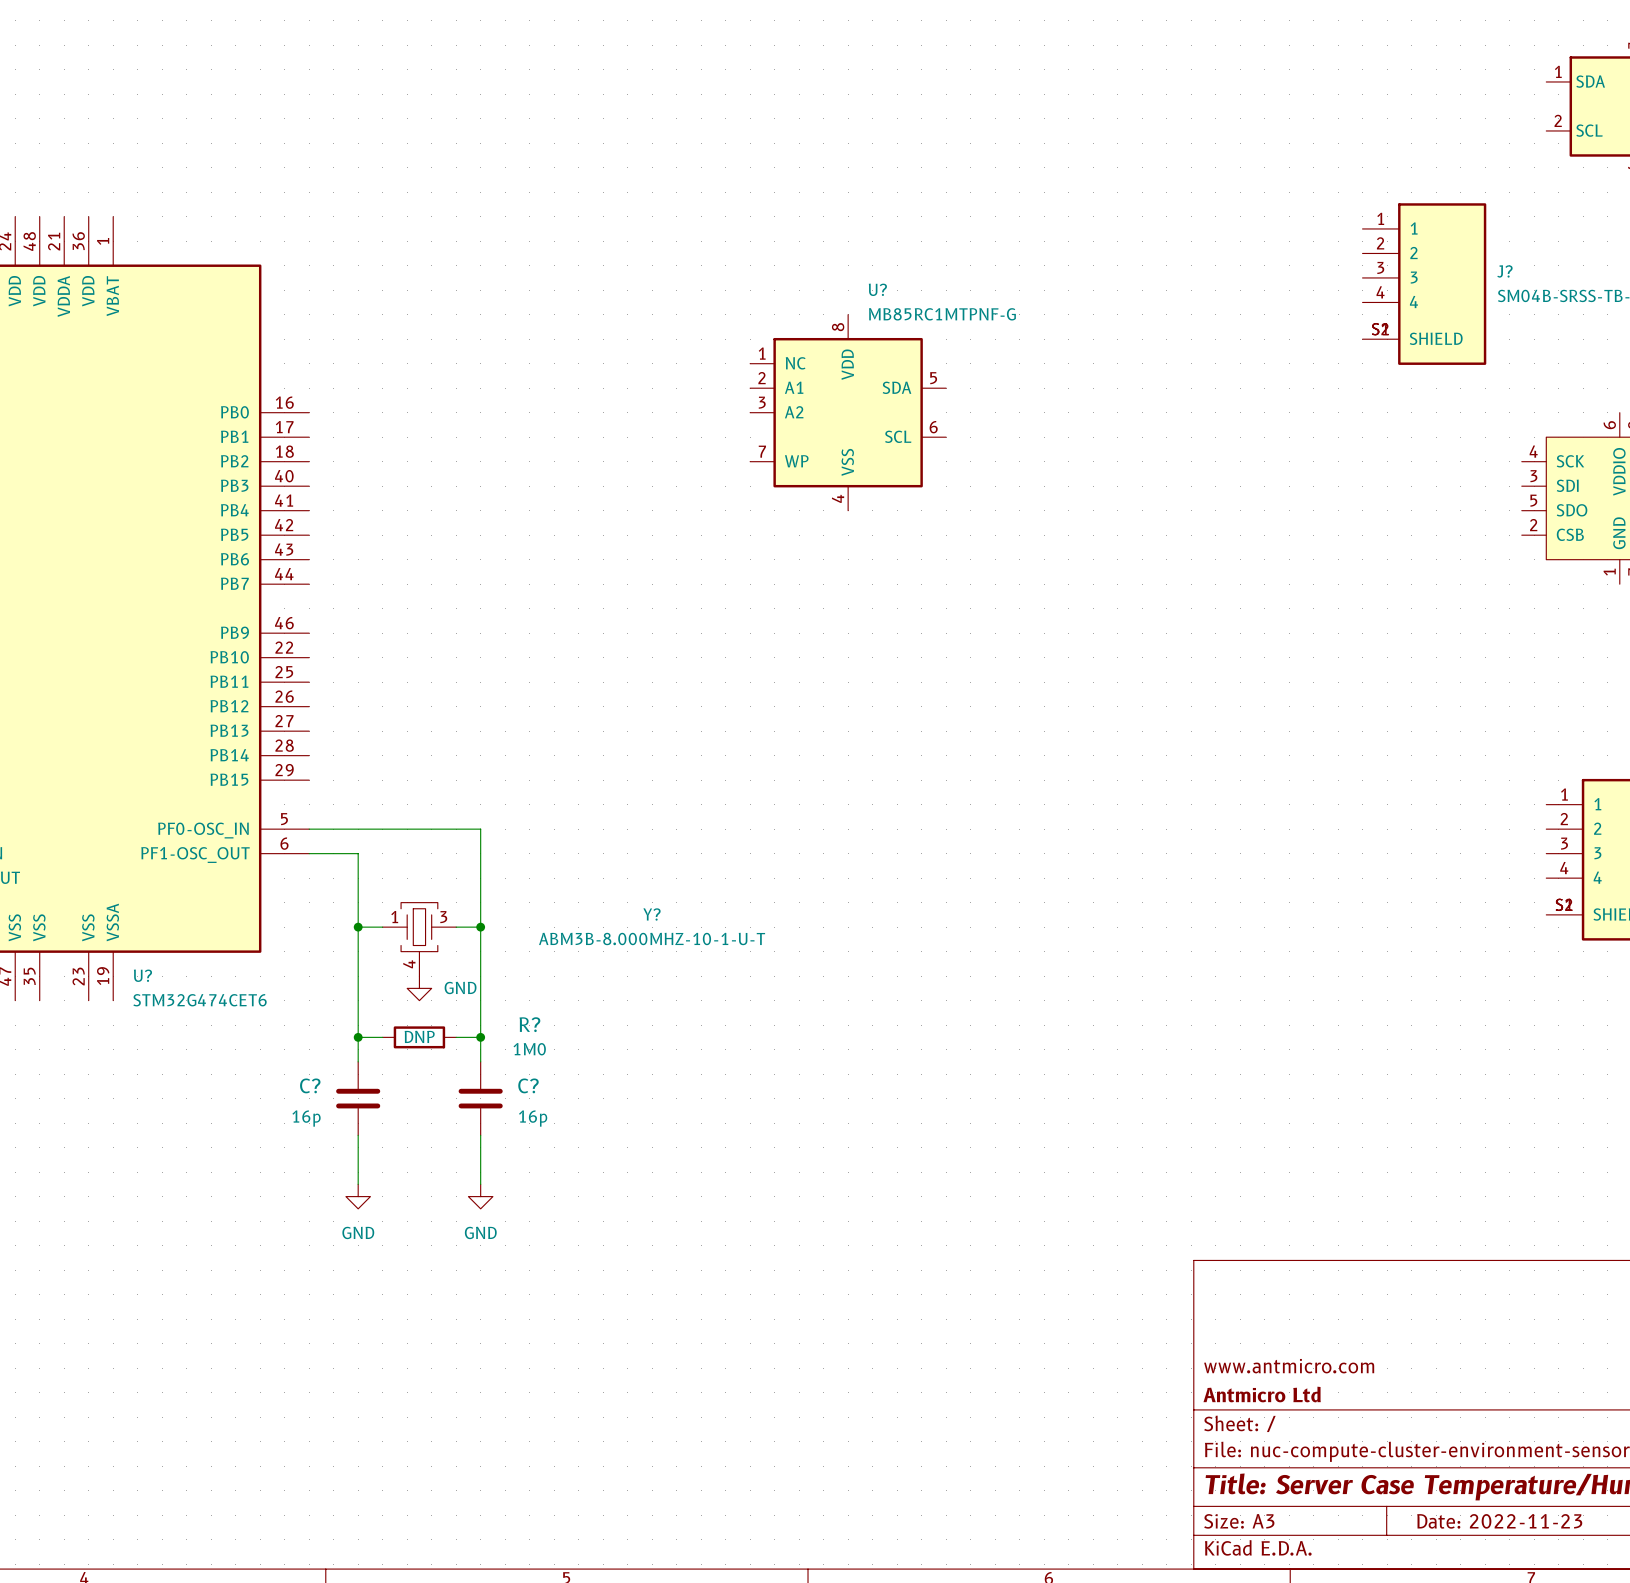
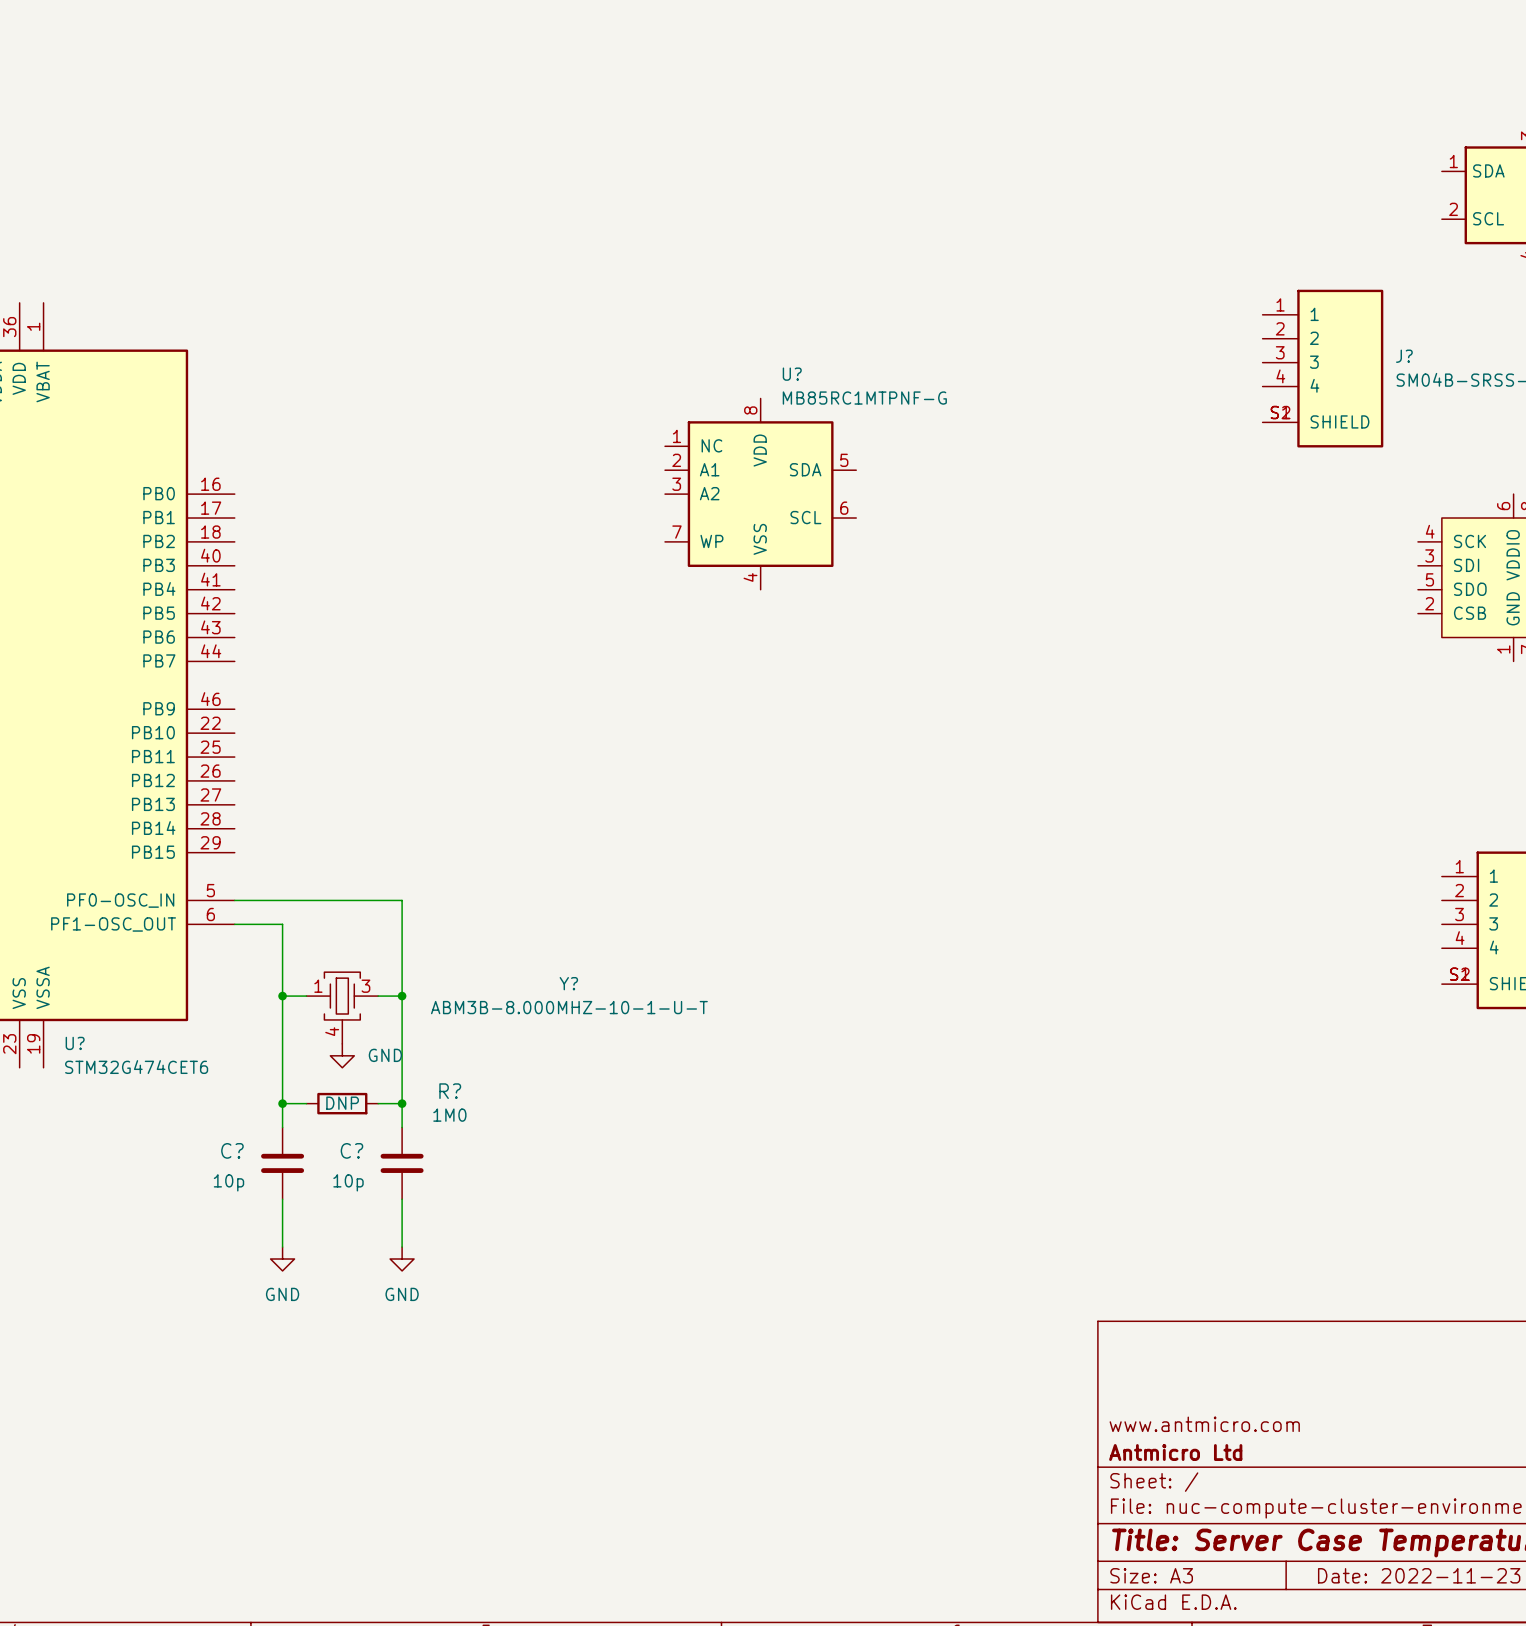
C? name position: C? (528, 1085) -> C? (351, 1150)
C? text: 16p (306, 1118) -> 10p (228, 1182)
C? text: 16p (533, 1118) -> 10p (348, 1182)

